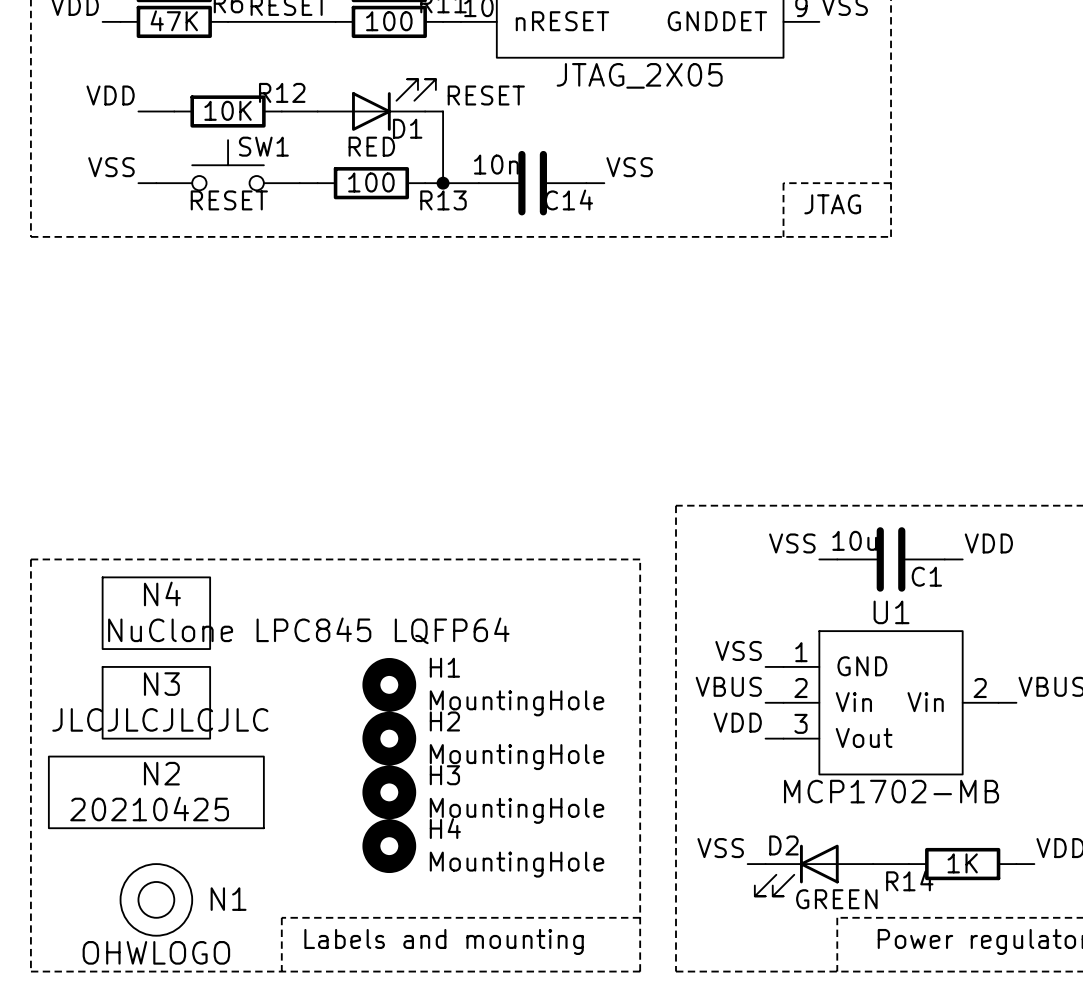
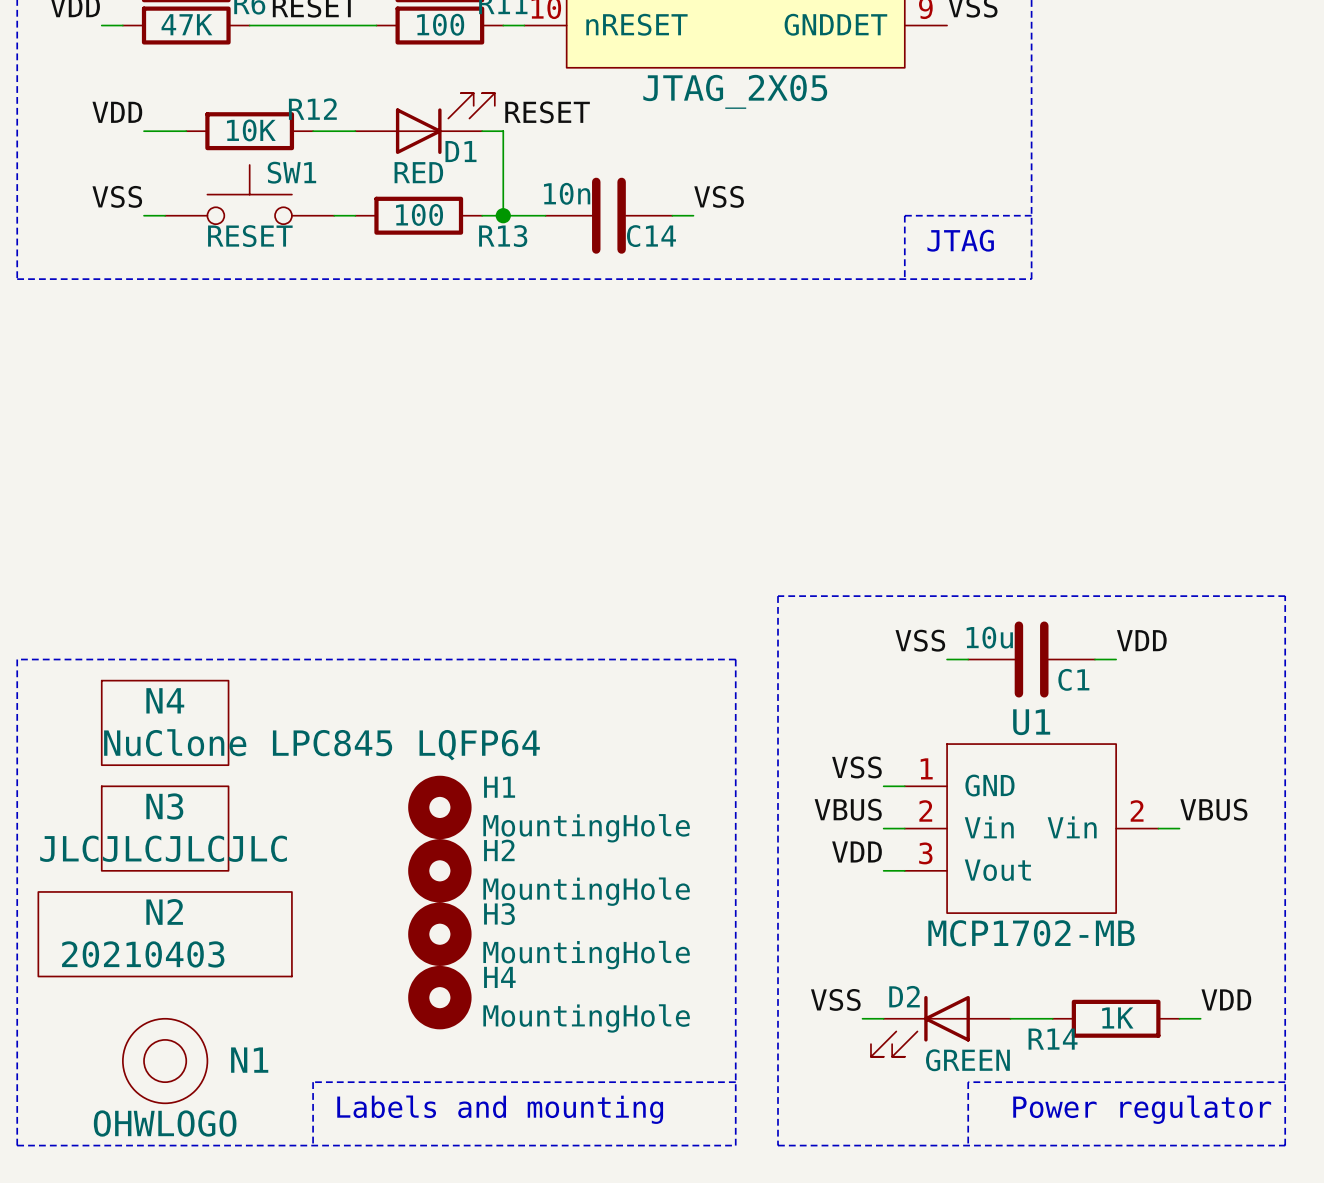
N2 value: 20210425 (149, 808) -> 20210403 (143, 954)

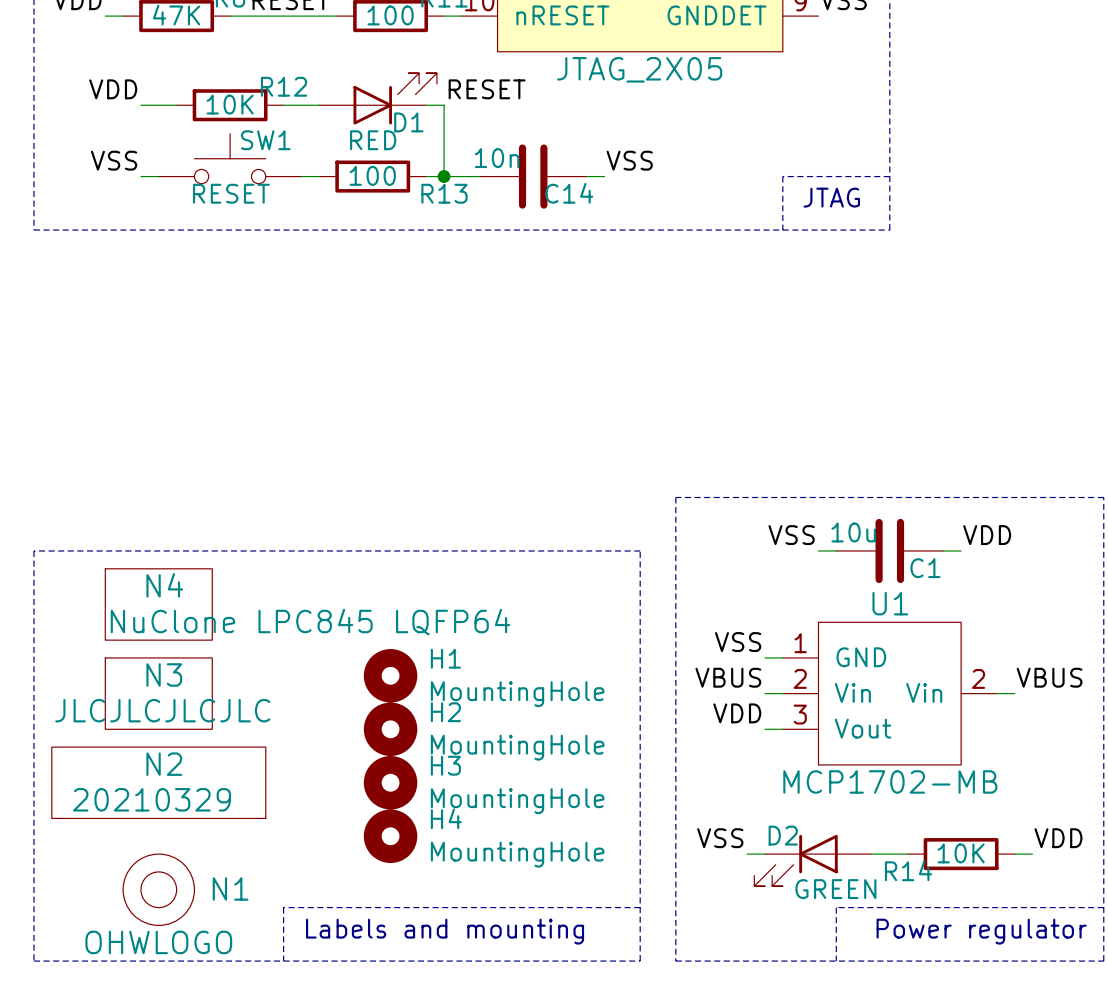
N2 value: 20210403 (143, 954) -> 20210329 (152, 799)
R14 value: 1K (1117, 1017) -> 10K (961, 853)

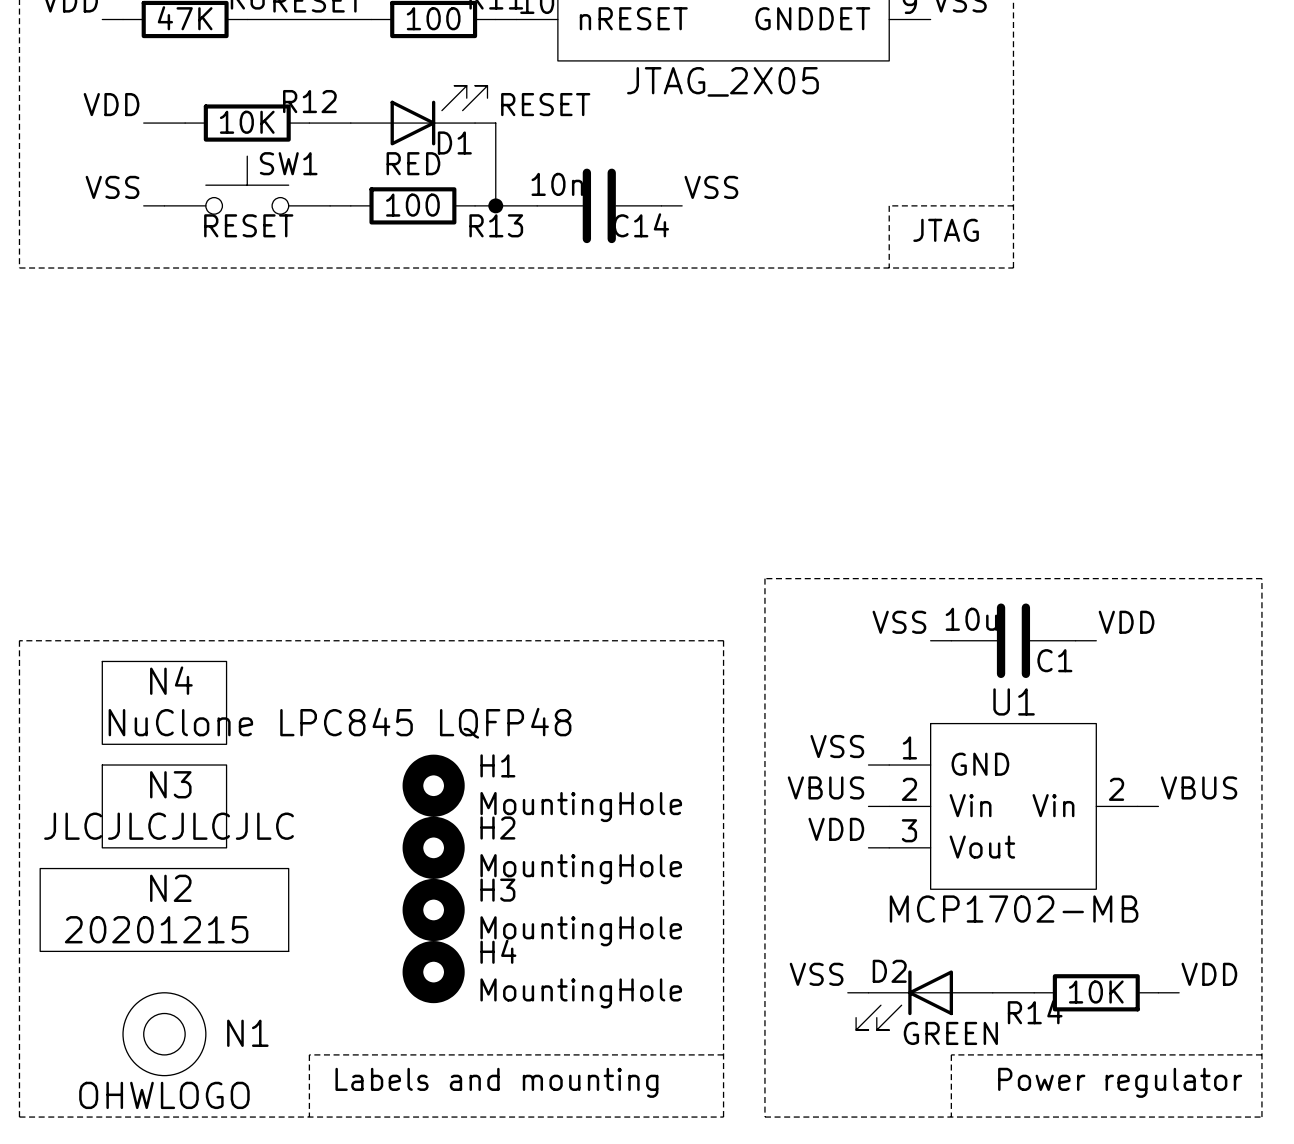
N4 value: NuClone LPC845 LQFP64 (310, 622) -> NuClone LPC845 LQFP48 (340, 723)
N2 value: 20210329 (152, 799) -> 20201215 (156, 929)

